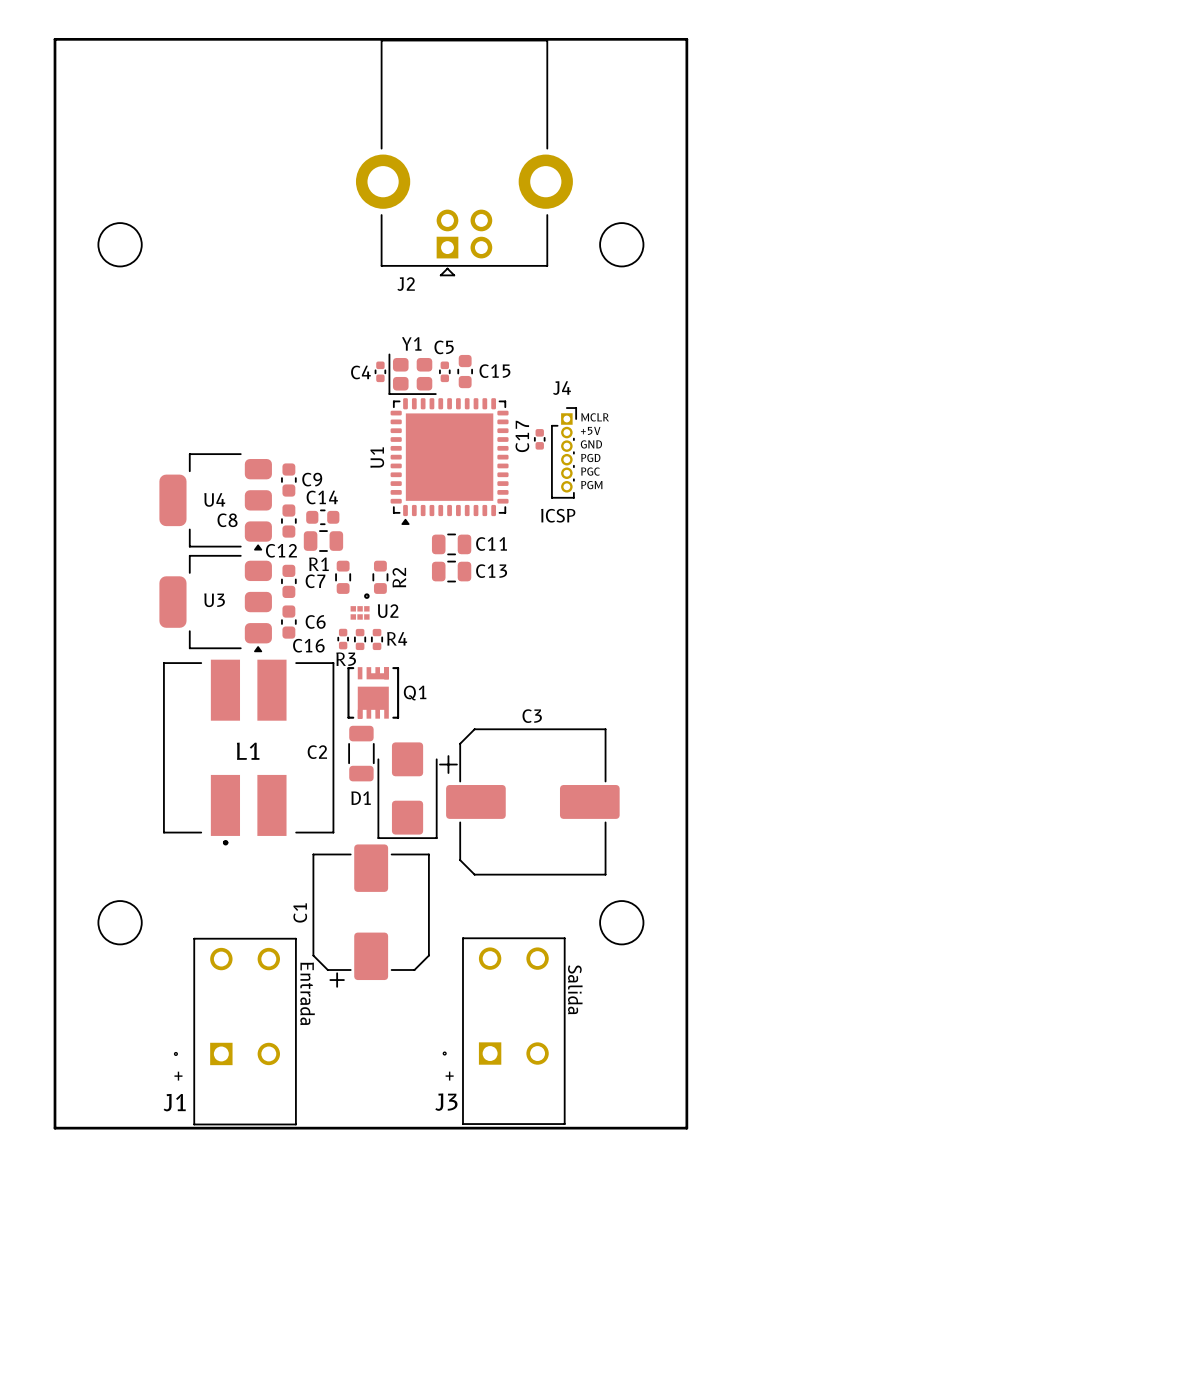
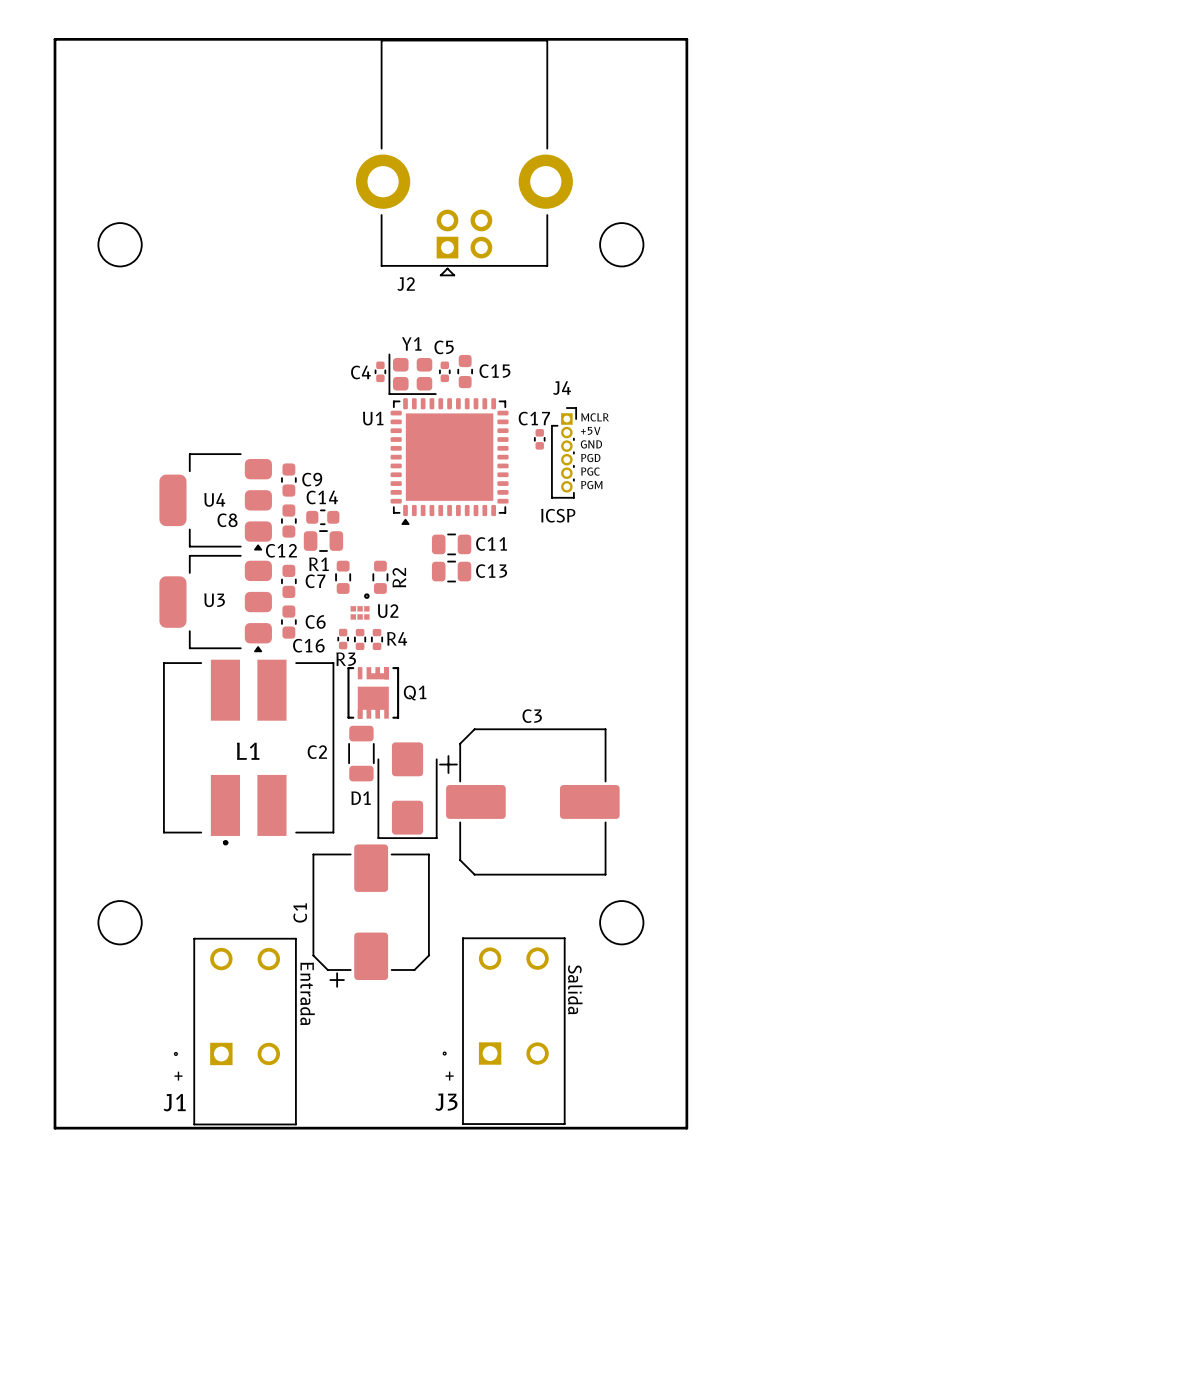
C17 name rotation: 0° (522, 436) -> 90° clockwise (534, 418)
U1 name rotation: 0° (377, 457) -> 90° clockwise (373, 418)
U1 name position: U1 (377, 457) -> U1 (373, 418)

